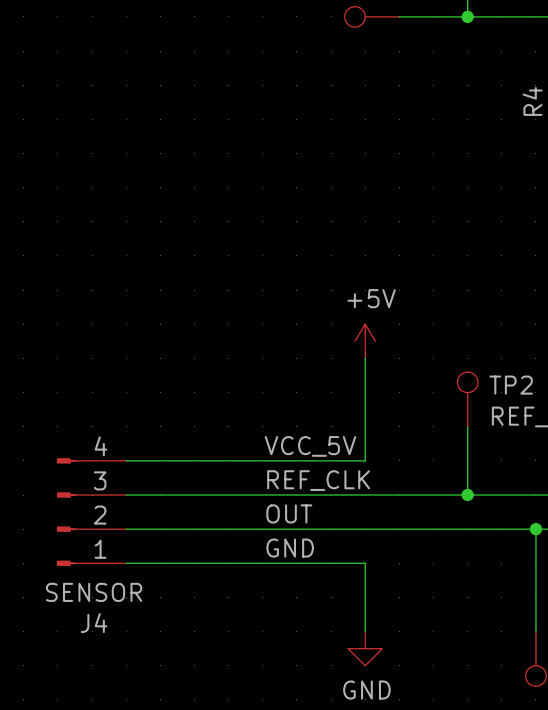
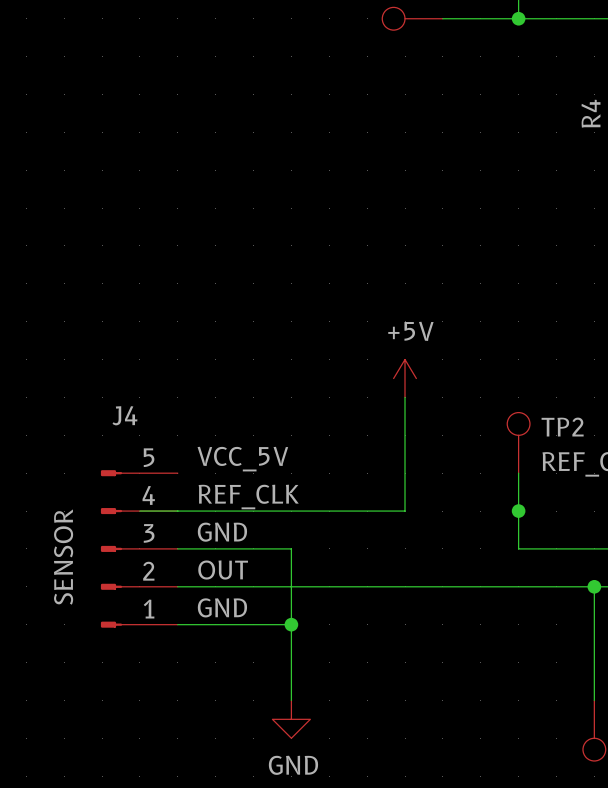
label position: VCC_5V (310, 446) -> VCC_5V (242, 459)
J4 symbol: [56, 458, 127, 567] -> [100, 470, 178, 628]
label: none -> GND (222, 532)
label position: REF_CLK (318, 480) -> REF_CLK (248, 496)
wire: (262, 495) (467, 495) -> (291, 548) (291, 700)
junction position: (467, 495) -> (518, 511)
label position: OUT (289, 513) -> OUT (223, 570)
label: none -> GND (222, 607)
label: GND (290, 548) -> none
wire: (262, 563) (365, 563) (365, 631) -> none
junction: none -> (291, 624)
J4 value position: SENSOR (94, 592) -> SENSOR (63, 557)
J4 name position: J4 (94, 623) -> J4 (124, 415)
power symbol position: GND (365, 648) -> GND (291, 719)

